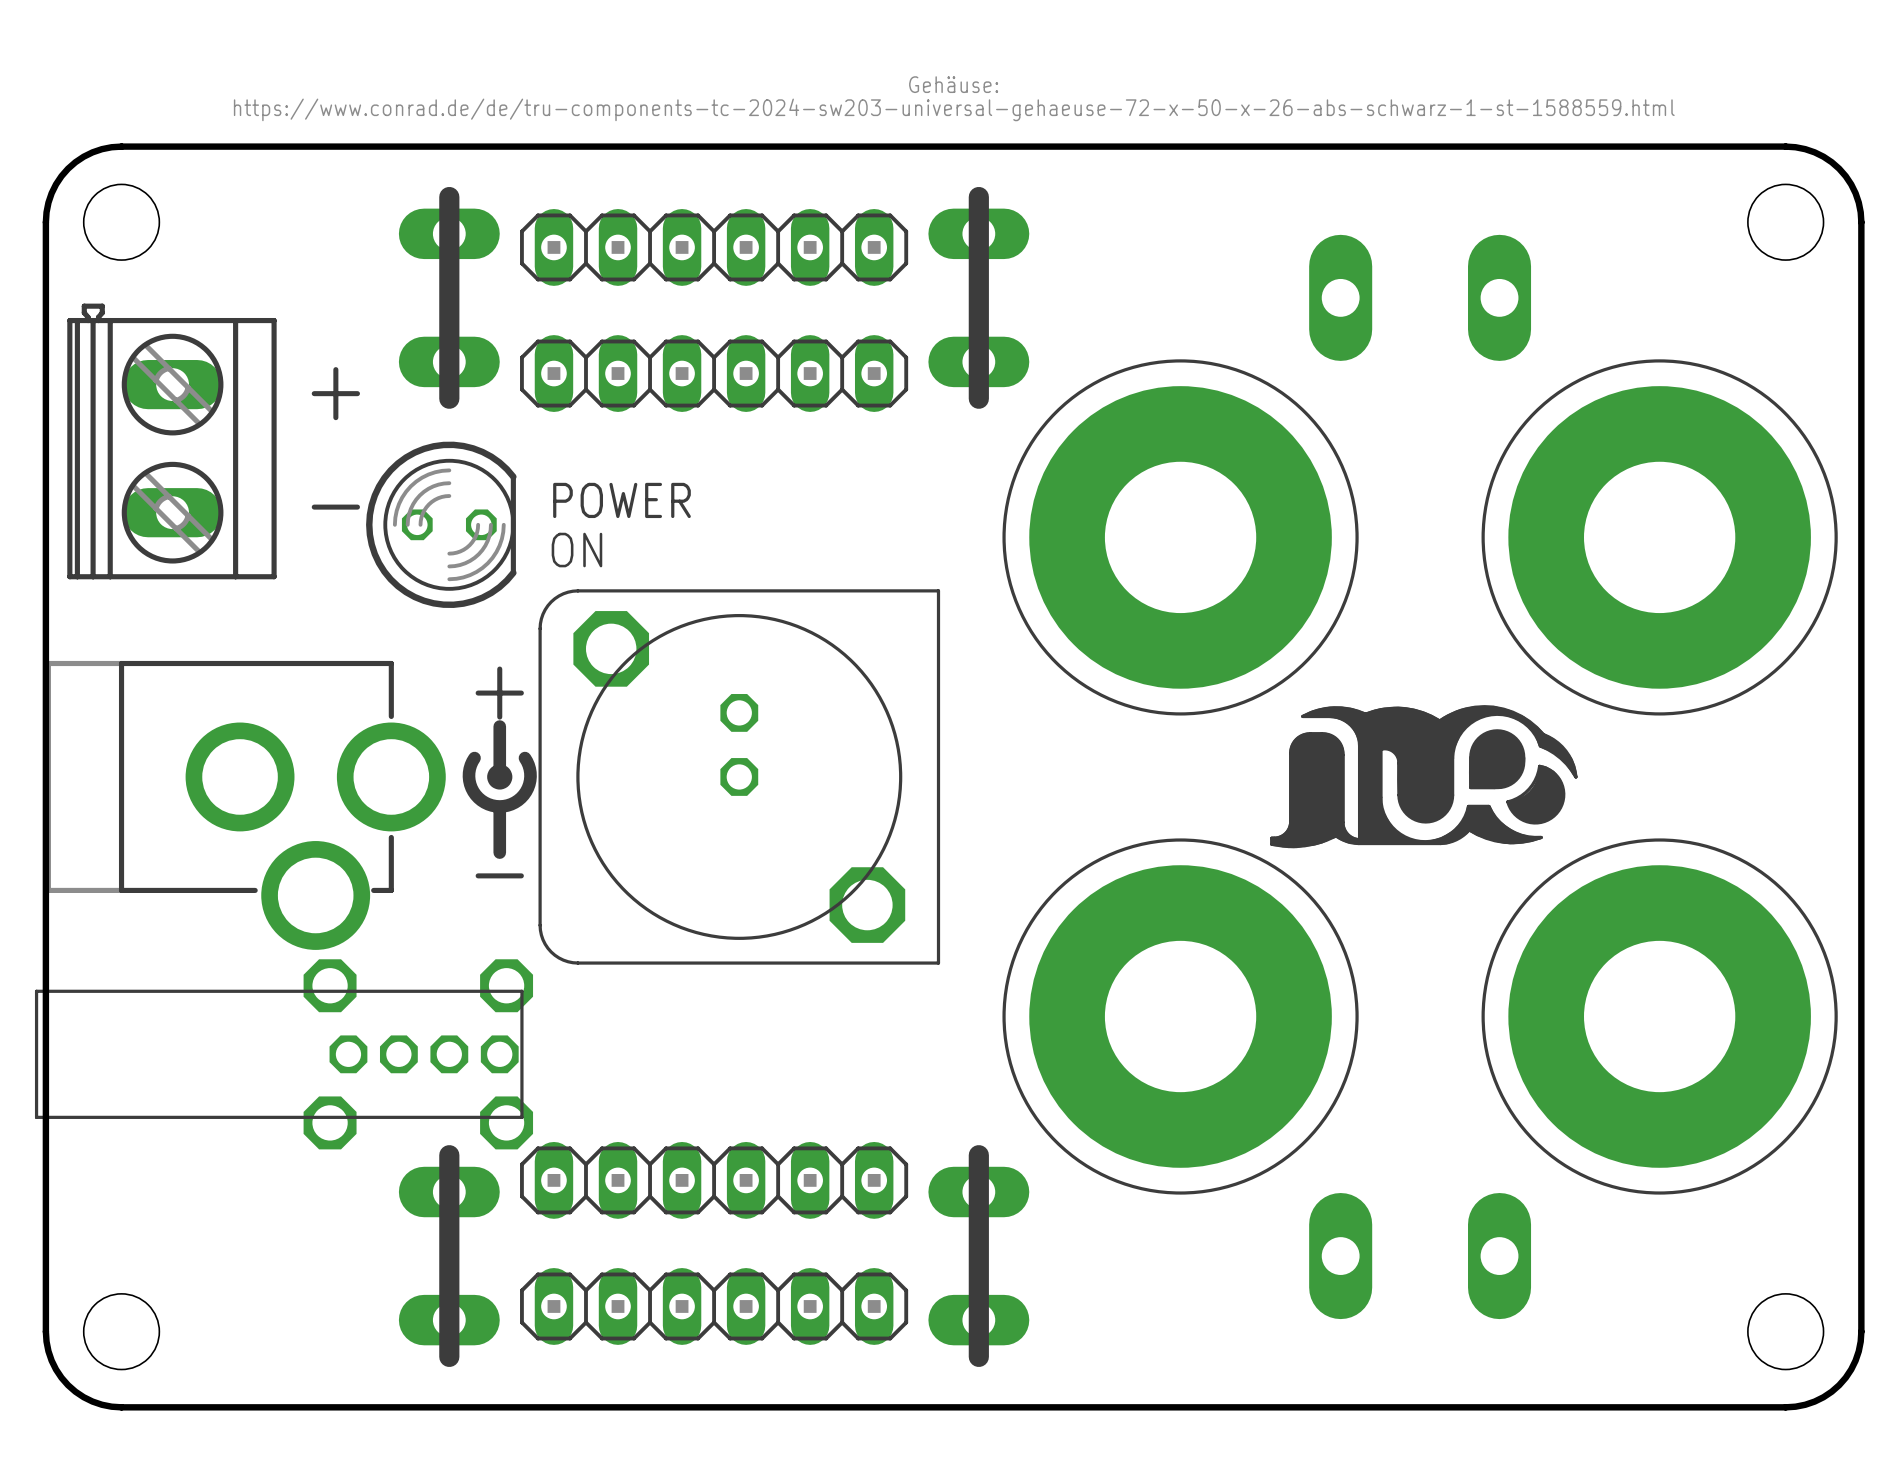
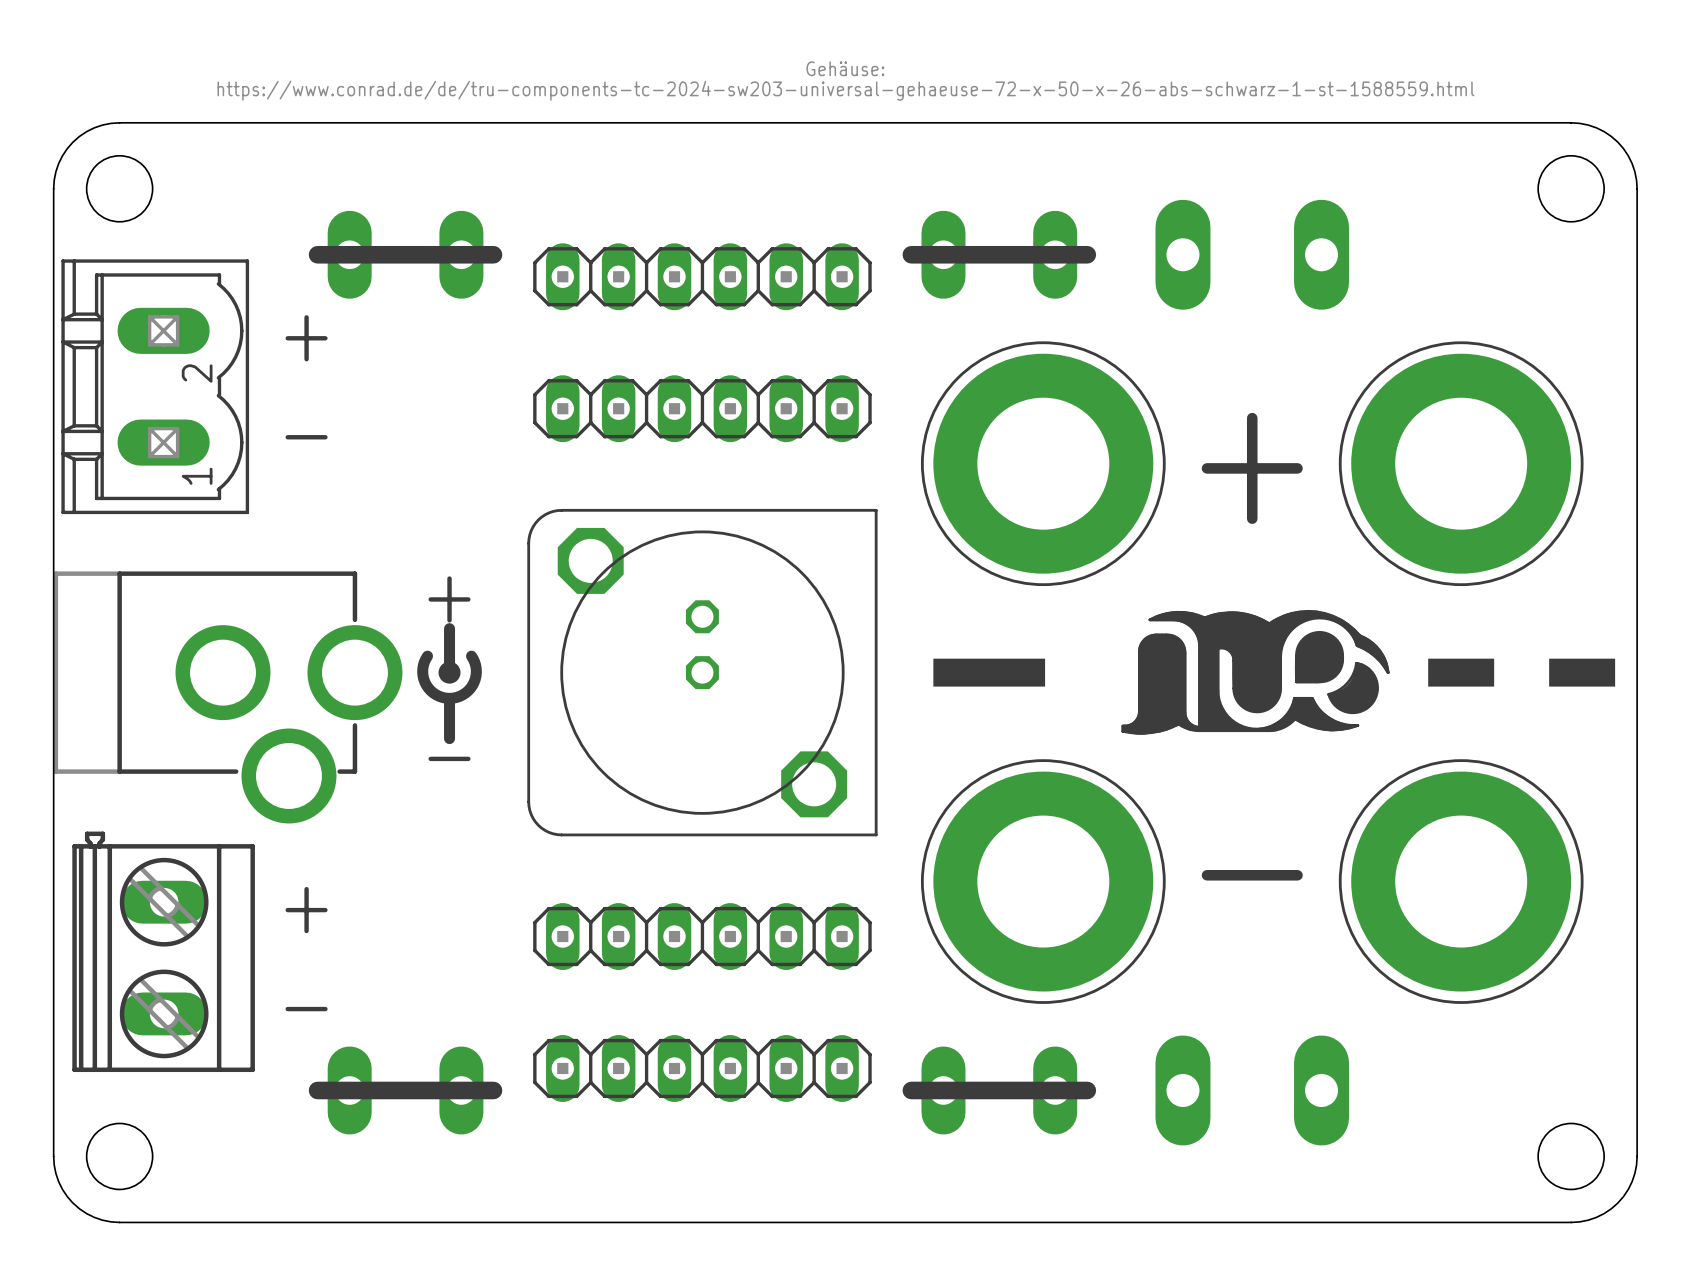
board edge width: thick (121, 146) (1785, 146) (1805, 149) (1831, 162) (1851, 184) (1858, 202) (1861, 222) (1861, 1331) (1858, 1351) (1845, 1377) (1823, 1397) (1805, 1404) (1785, 1407) (121, 1407) (101, 1404) (75, 1391) (56, 1369) (48, 1351) (45, 1331) (45, 222) (51, 193) (68, 168) (92, 152) (121, 146) -> thin (119, 122) (1571, 122) (1588, 125) (1611, 136) (1628, 155) (1634, 171) (1637, 188) (1637, 1156) (1634, 1173) (1623, 1196) (1604, 1213) (1588, 1220) (1571, 1222) (119, 1222) (102, 1220) (79, 1208) (62, 1189) (55, 1173) (53, 1156) (53, 188) (58, 163) (72, 142) (94, 127) (119, 122)
part: (714, 247) -> none
part rotation: 0° (449, 297) -> 90° clockwise (405, 254)
part rotation: 0° (978, 297) -> 90° clockwise (999, 254)
part position: (978, 297) -> (999, 254)
part footprint: [67, 303, 277, 580] -> [61, 259, 250, 515]
part: none -> (702, 276)
part footprint: [1002, 359, 1359, 716] -> [920, 341, 1166, 587]
part footprint: [1481, 359, 1838, 716] -> [1338, 341, 1584, 587]
part: (714, 373) -> none
part: none -> (702, 408)
POWER: (441, 524) -> none
text: none -> + (1252, 468)
text: ON (576, 550) -> none
part position: (739, 776) -> (702, 672)
line: none -> (933, 672) (1109, 672)
line: none -> (1428, 672) (1494, 672)
line: none -> (1549, 672) (1615, 672)
part footprint: [1002, 838, 1359, 1195] -> [920, 759, 1166, 1004]
part footprint: [1481, 838, 1838, 1195] -> [1338, 759, 1584, 1004]
text: none -> - (1252, 875)
text: none -> + (306, 910)
part: (284, 1054) -> none
part: none -> (702, 936)
part: none -> (163, 951)
text: none -> - (306, 1009)
part: (714, 1180) -> none
part: none -> (702, 1068)
part rotation: 0° (449, 1256) -> 90° clockwise (405, 1090)
part rotation: 0° (978, 1256) -> 90° clockwise (999, 1090)
part position: (978, 1256) -> (999, 1090)
part: (714, 1306) -> none

